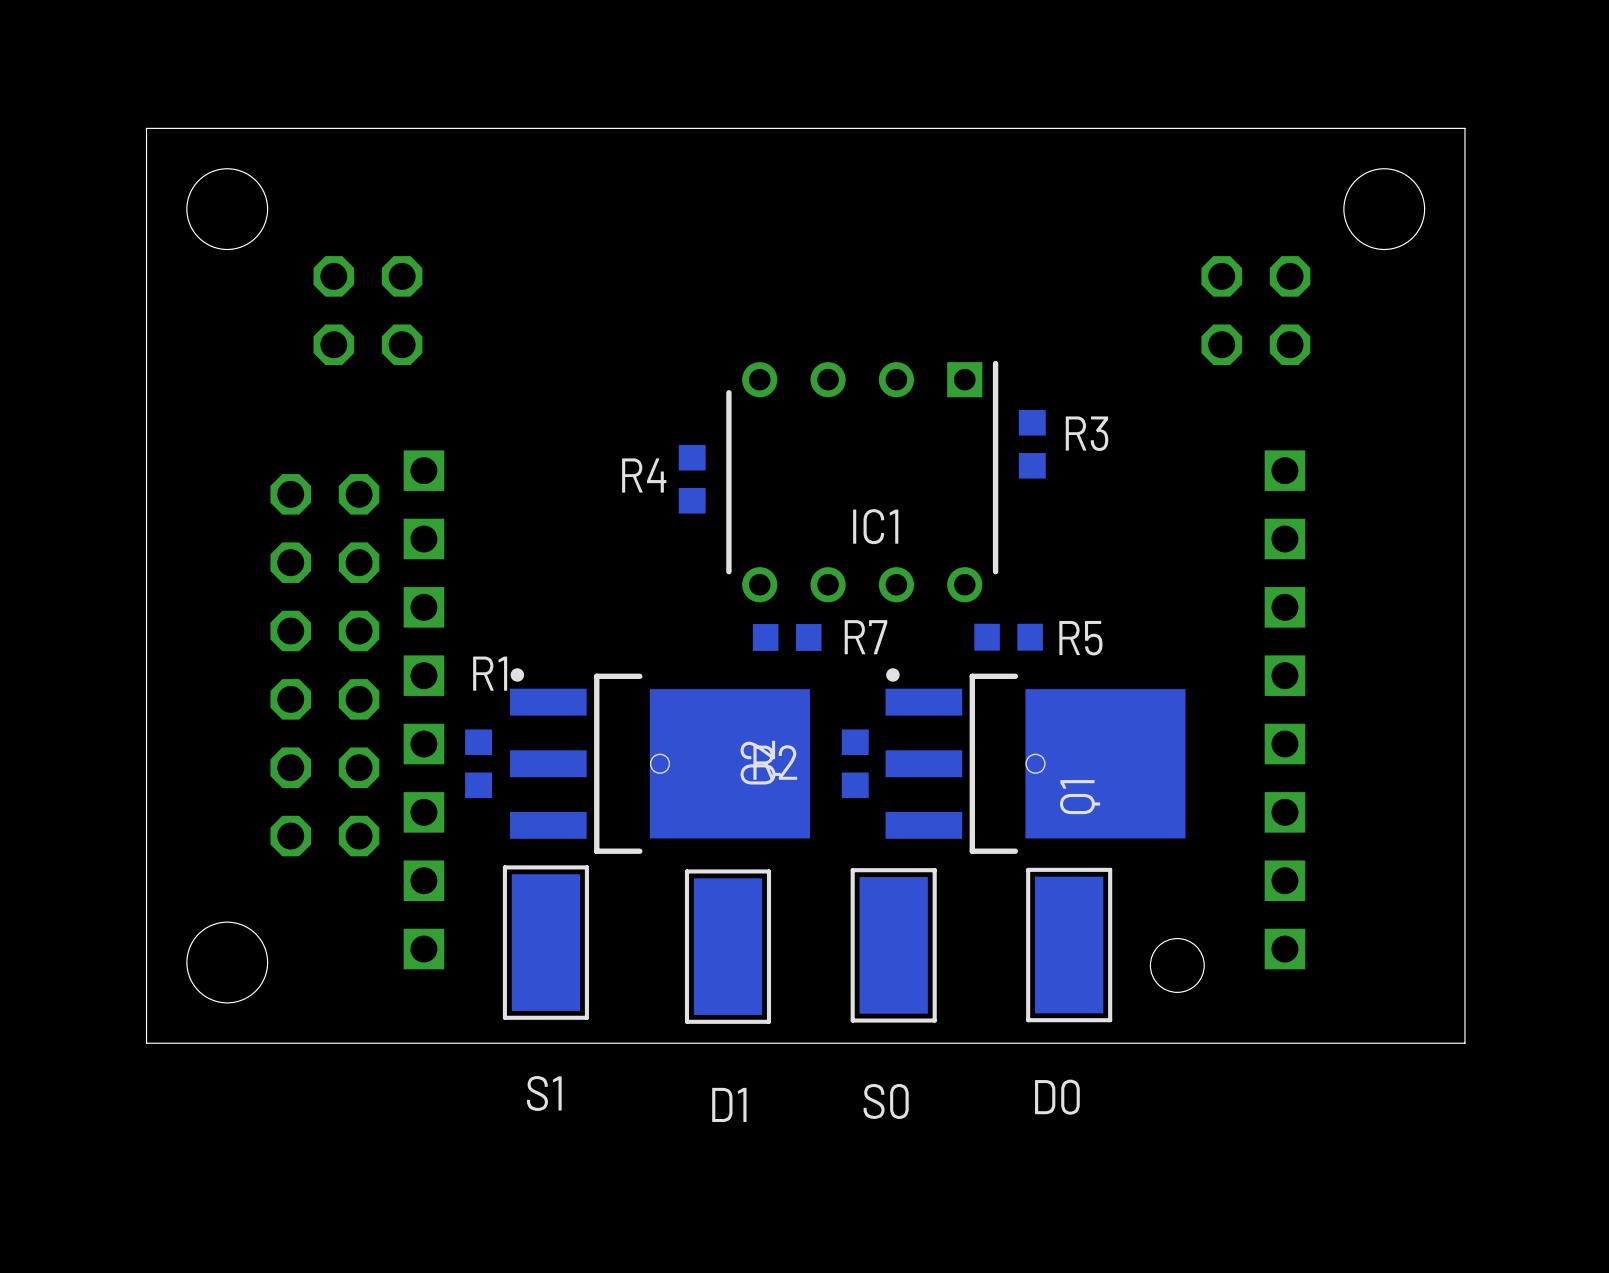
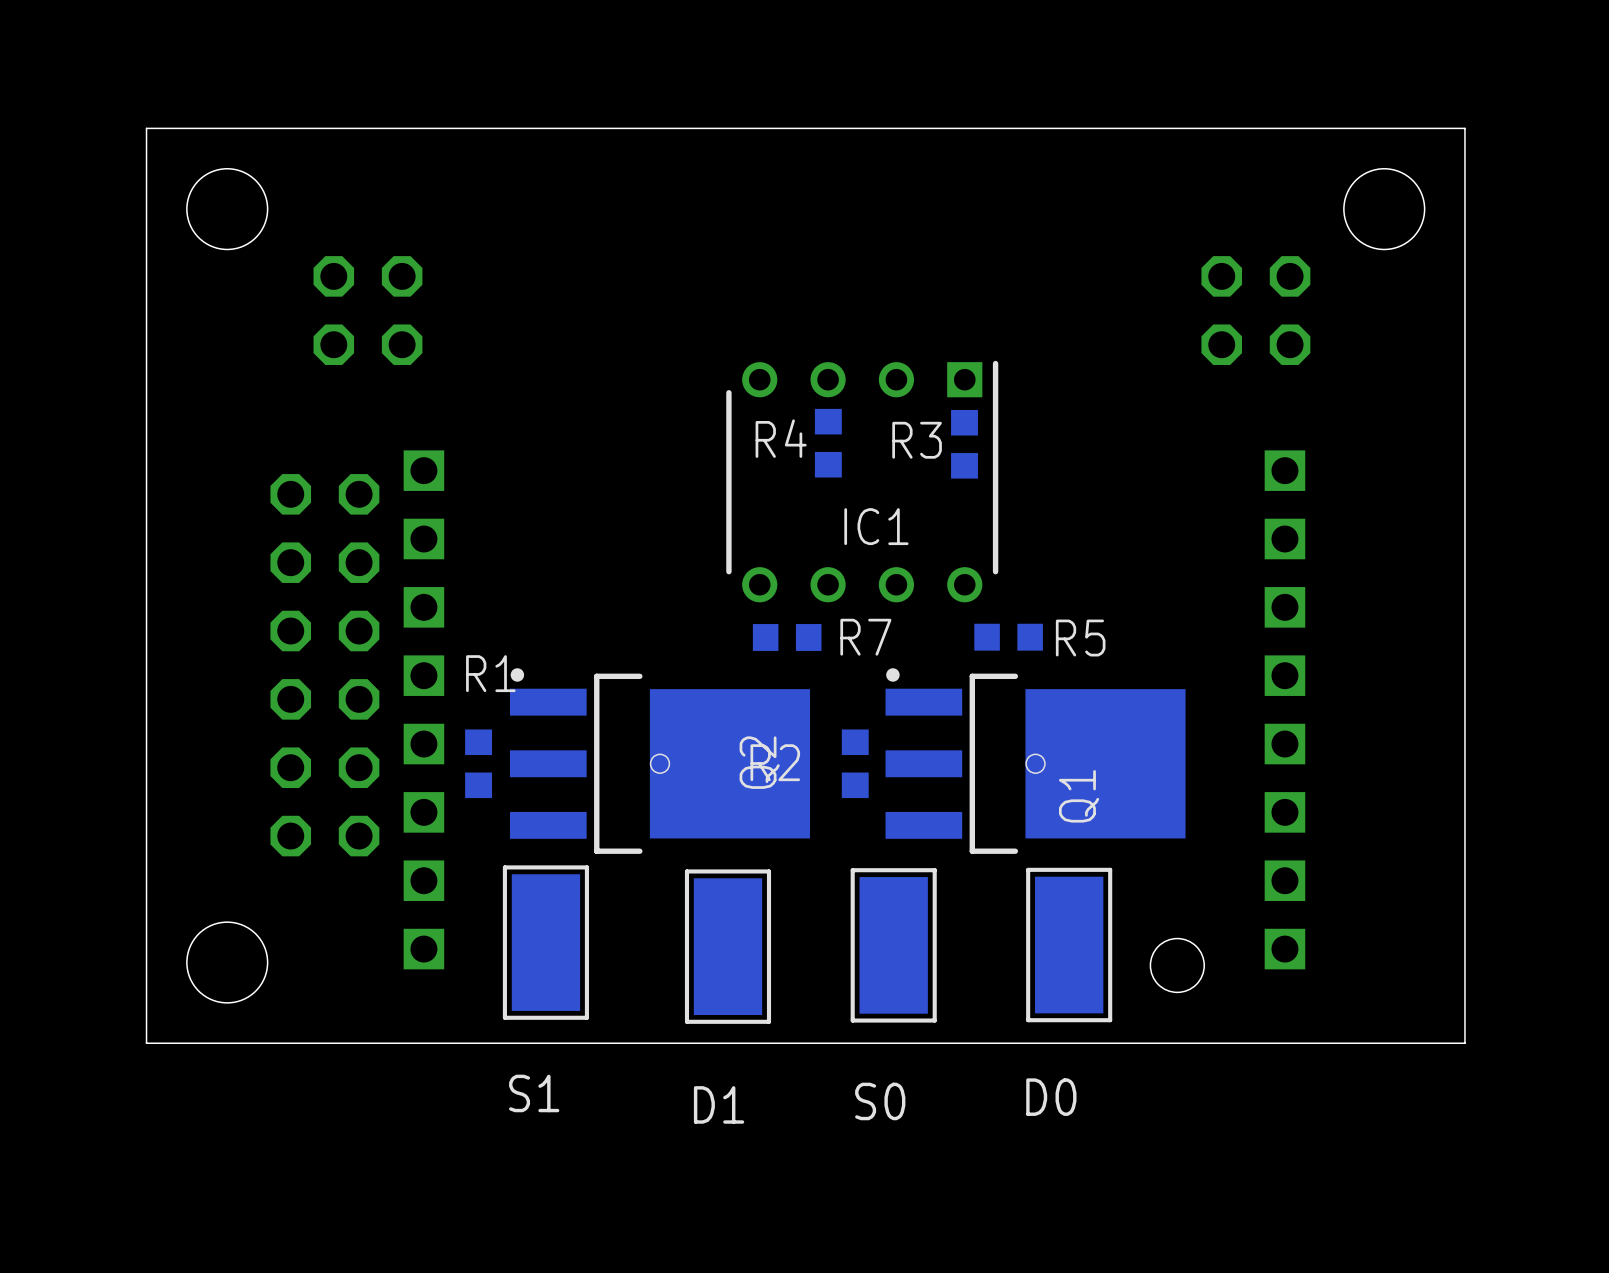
R3 name position: R3 (1087, 433) -> R3 (917, 440)
R3 position: (1032, 444) -> (964, 444)
R4 position: (692, 479) -> (828, 443)

